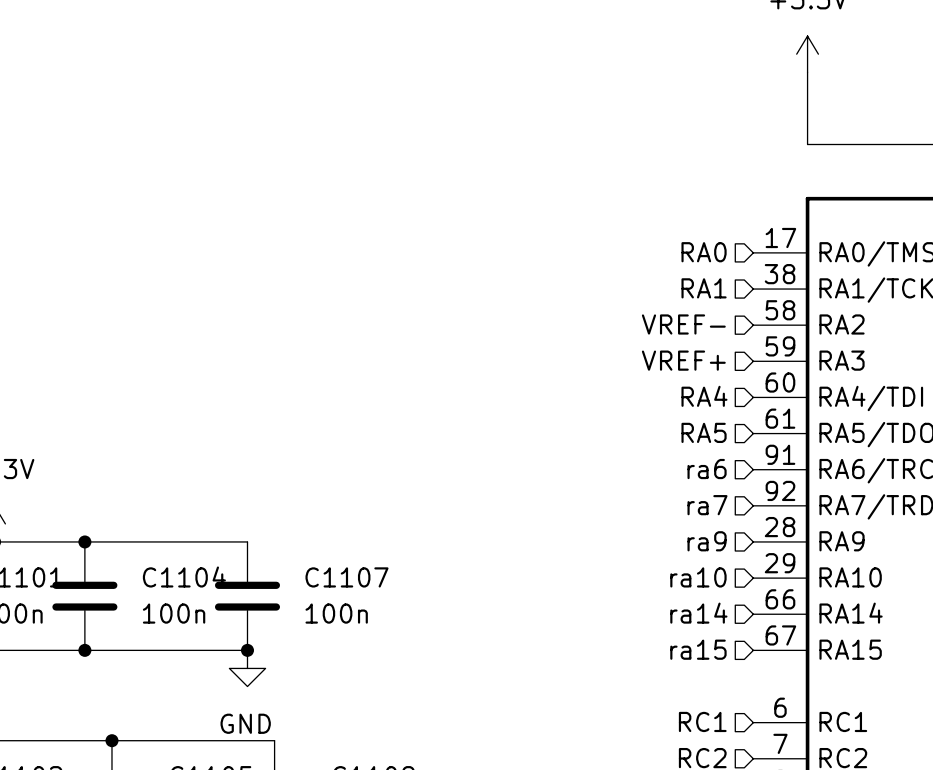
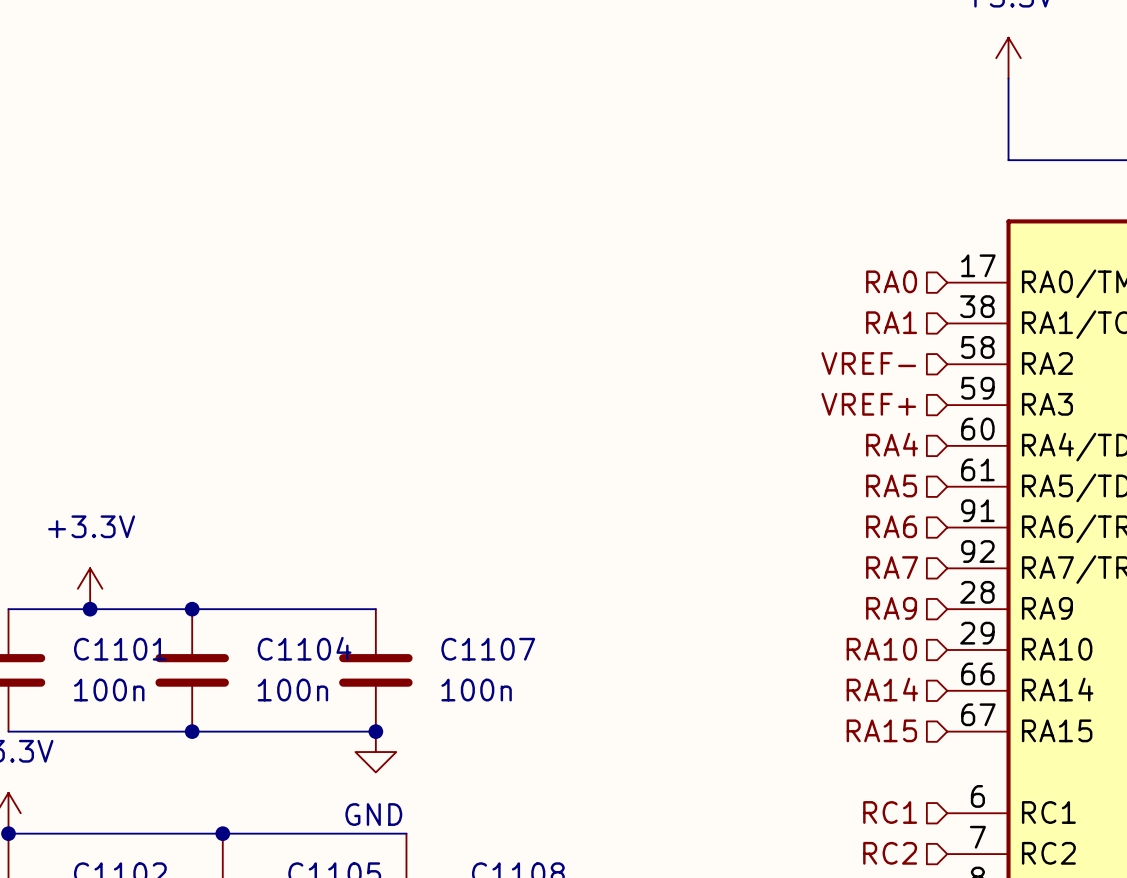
hierarchical label: ra6 (707, 469) -> RA6 (891, 526)
hierarchical label: ra7 (707, 505) -> RA7 (892, 567)
hierarchical label: ra9 (707, 541) -> RA9 (891, 608)
hierarchical label: ra10 (698, 577) -> RA10 (881, 649)
hierarchical label: ra14 (698, 613) -> RA14 (882, 689)
hierarchical label: ra15 (698, 649) -> RA15 (881, 730)

